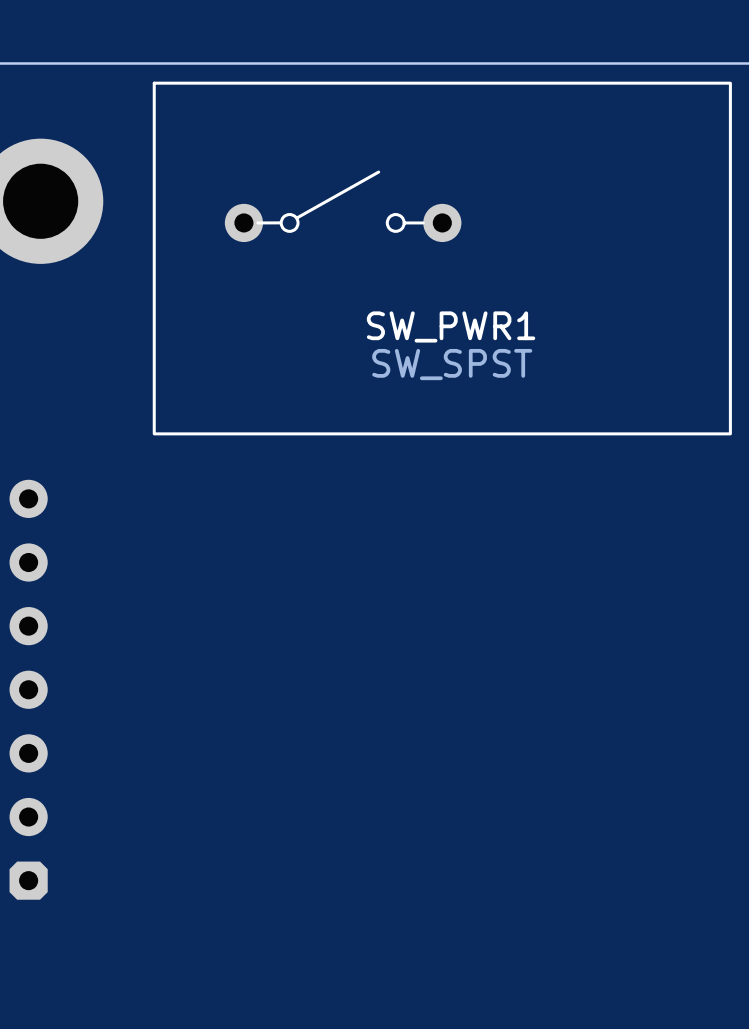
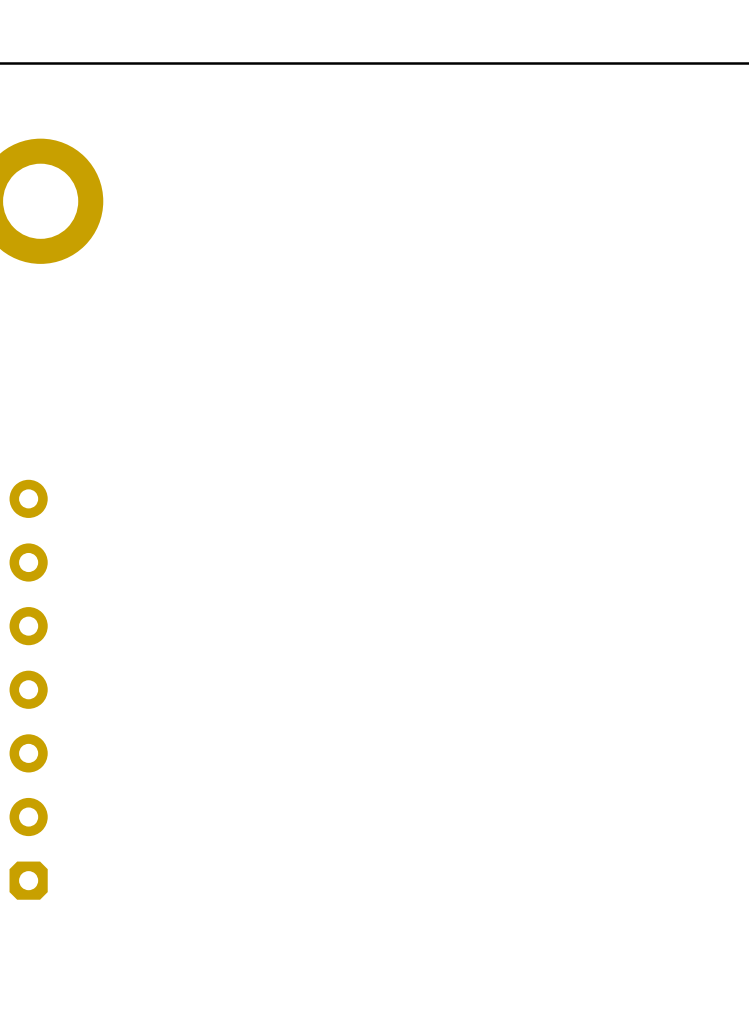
SW_PWR1: SW_SPST (442, 258) -> none

